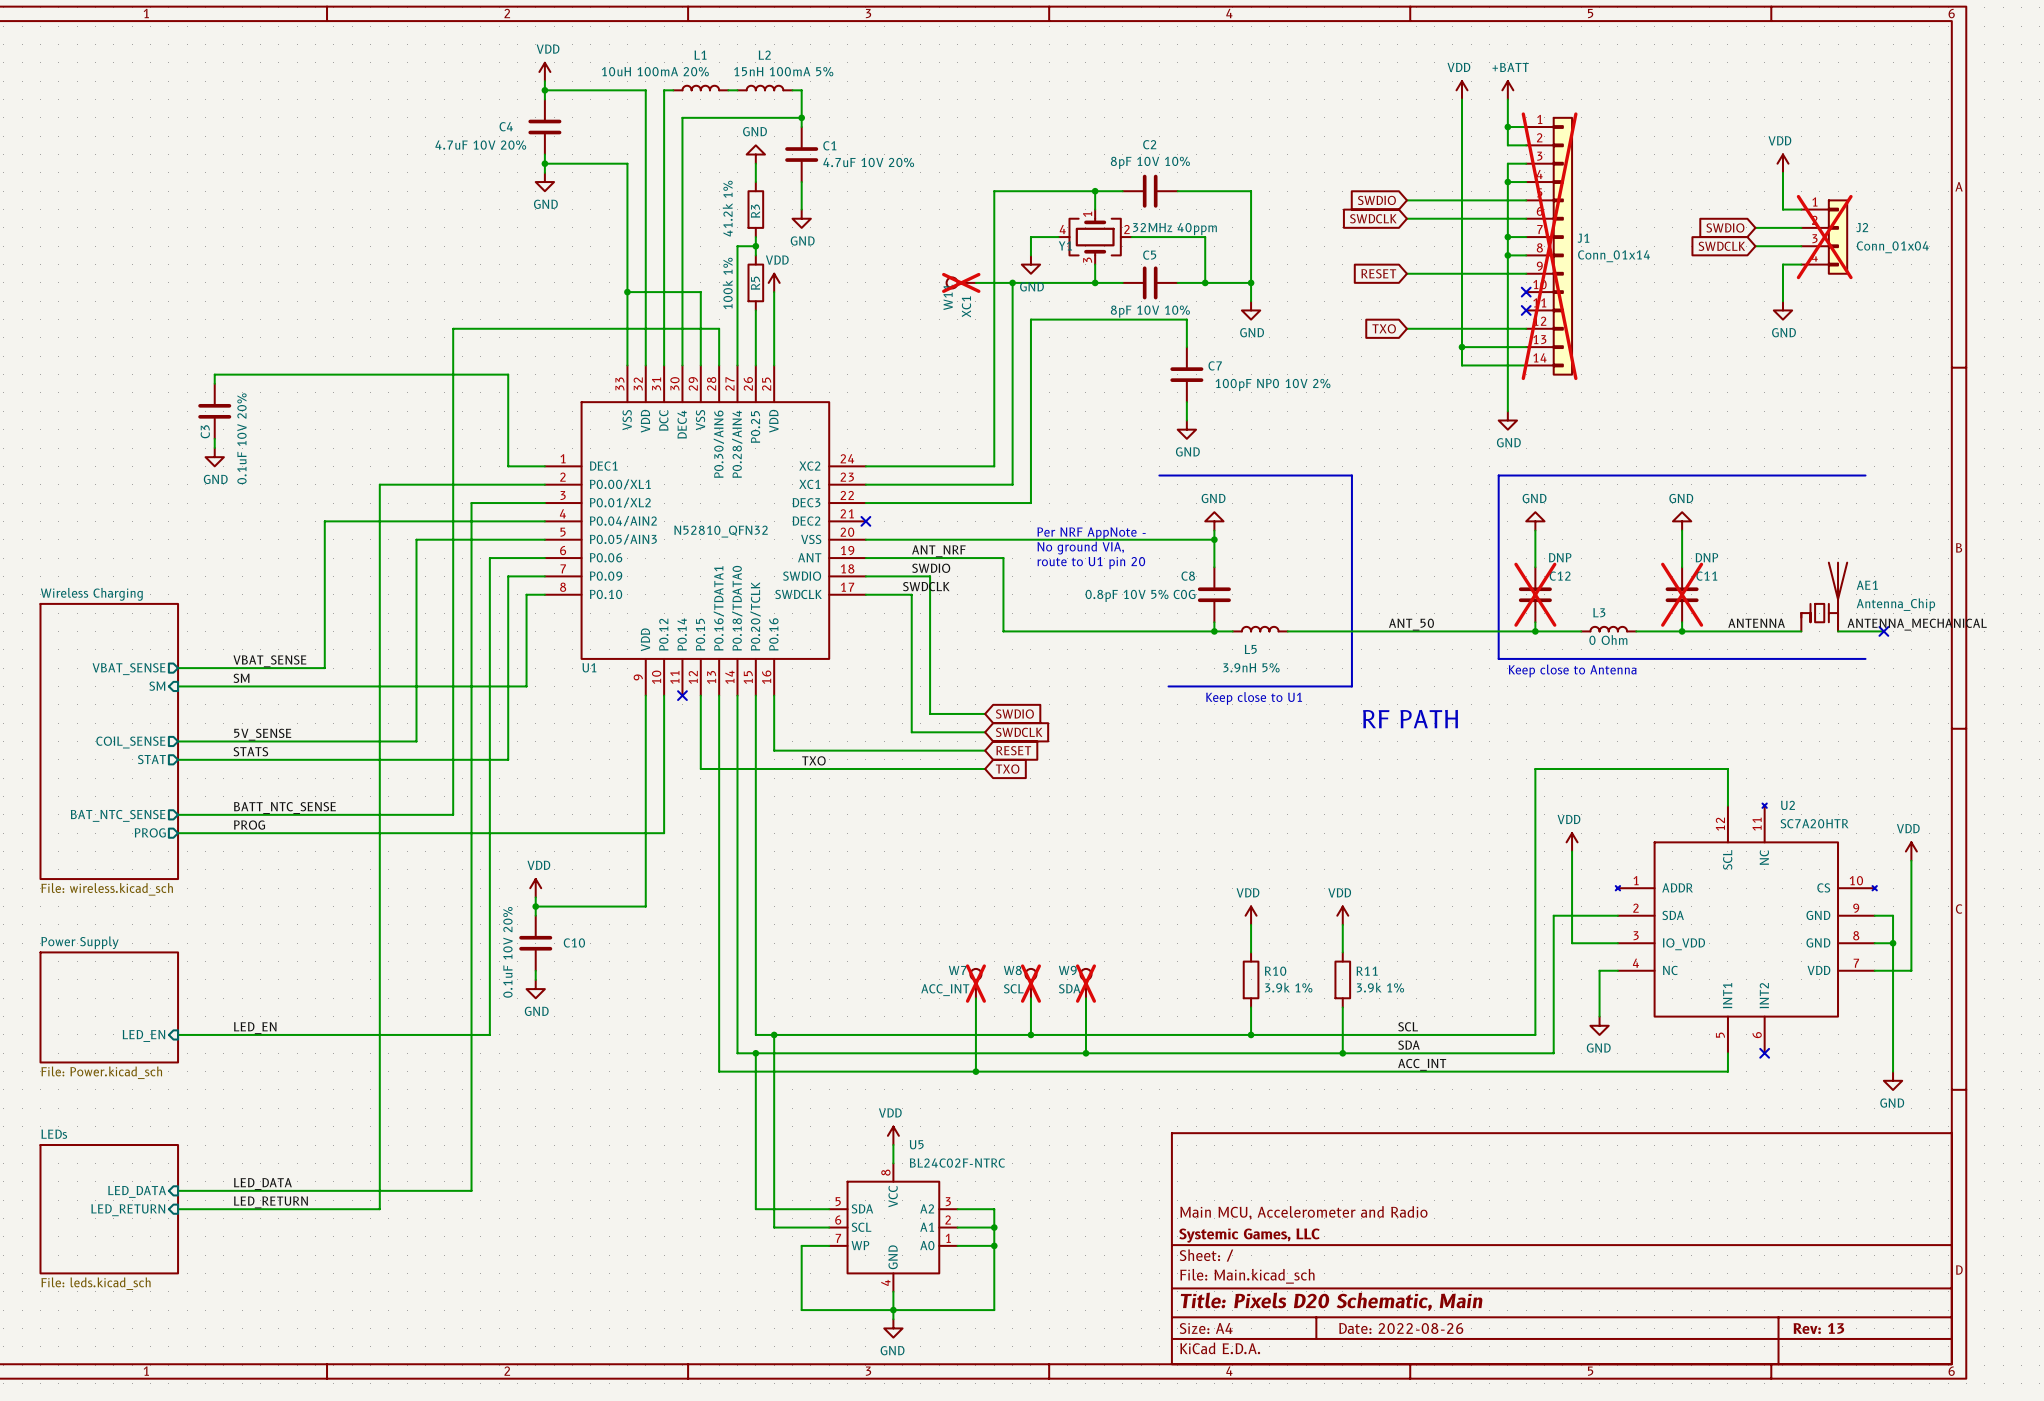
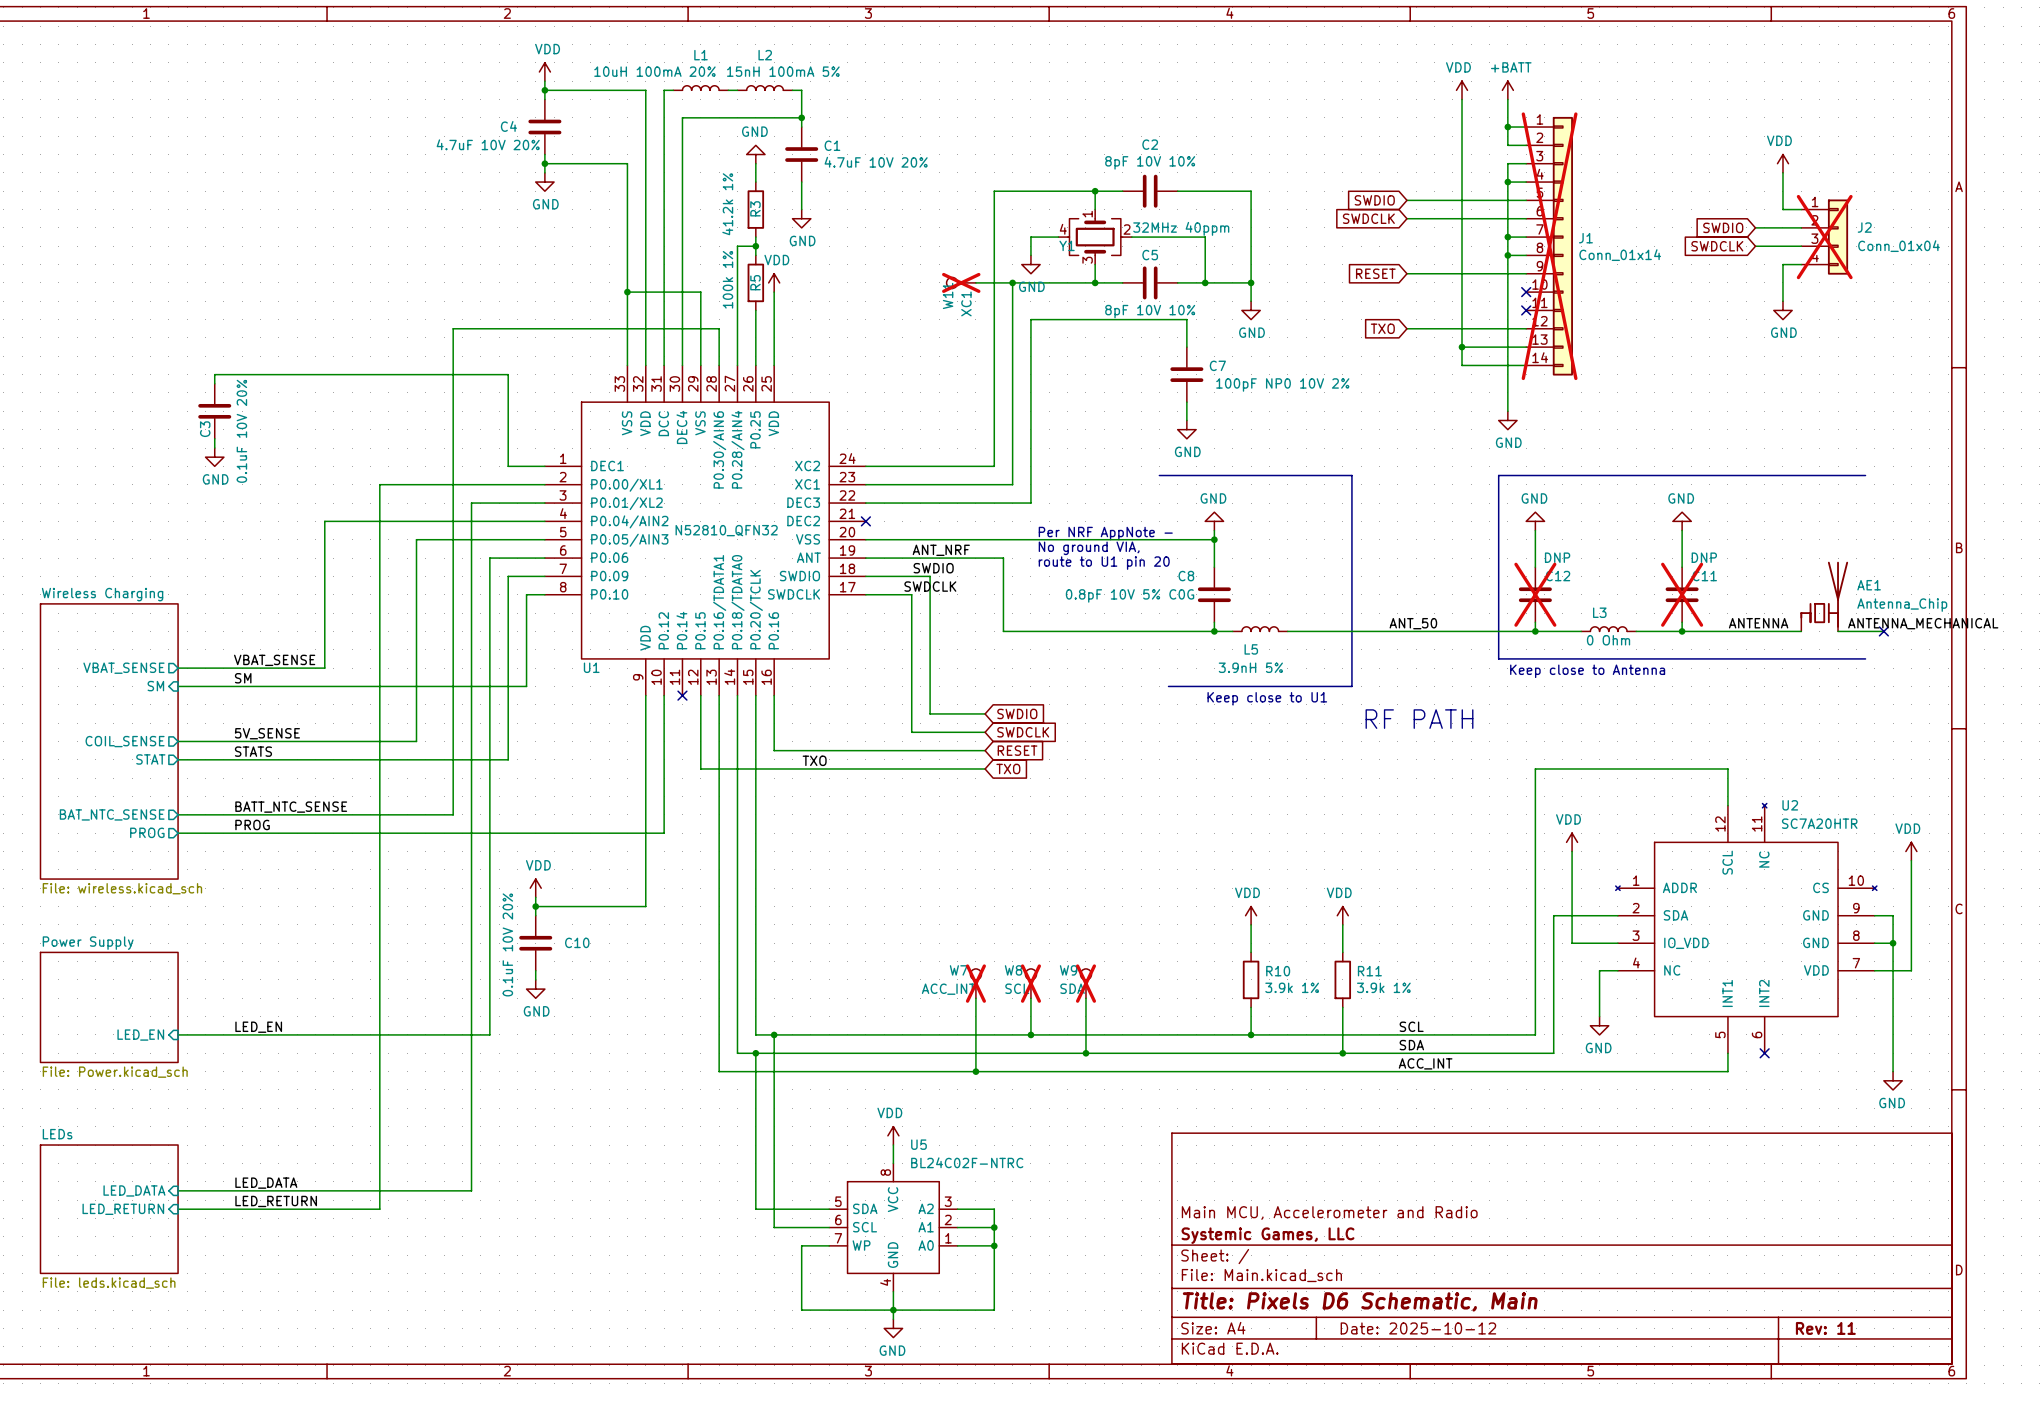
title block: Title: Pixels D20 Schematic, Main (1331, 1301) -> Title: Pixels D6 Schematic, Main (1360, 1301)
title block: Date: 2022-08-26 (1401, 1328) -> Date: 2025-10-12 (1418, 1328)
title block: Rev: 13 (1818, 1328) -> Rev: 11 (1825, 1328)

